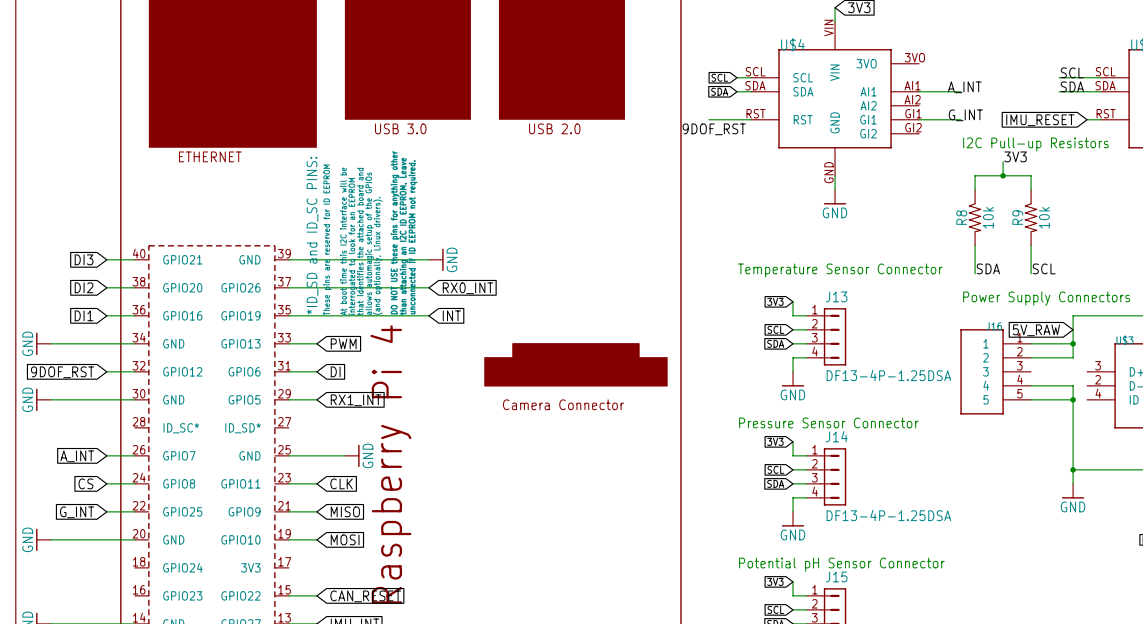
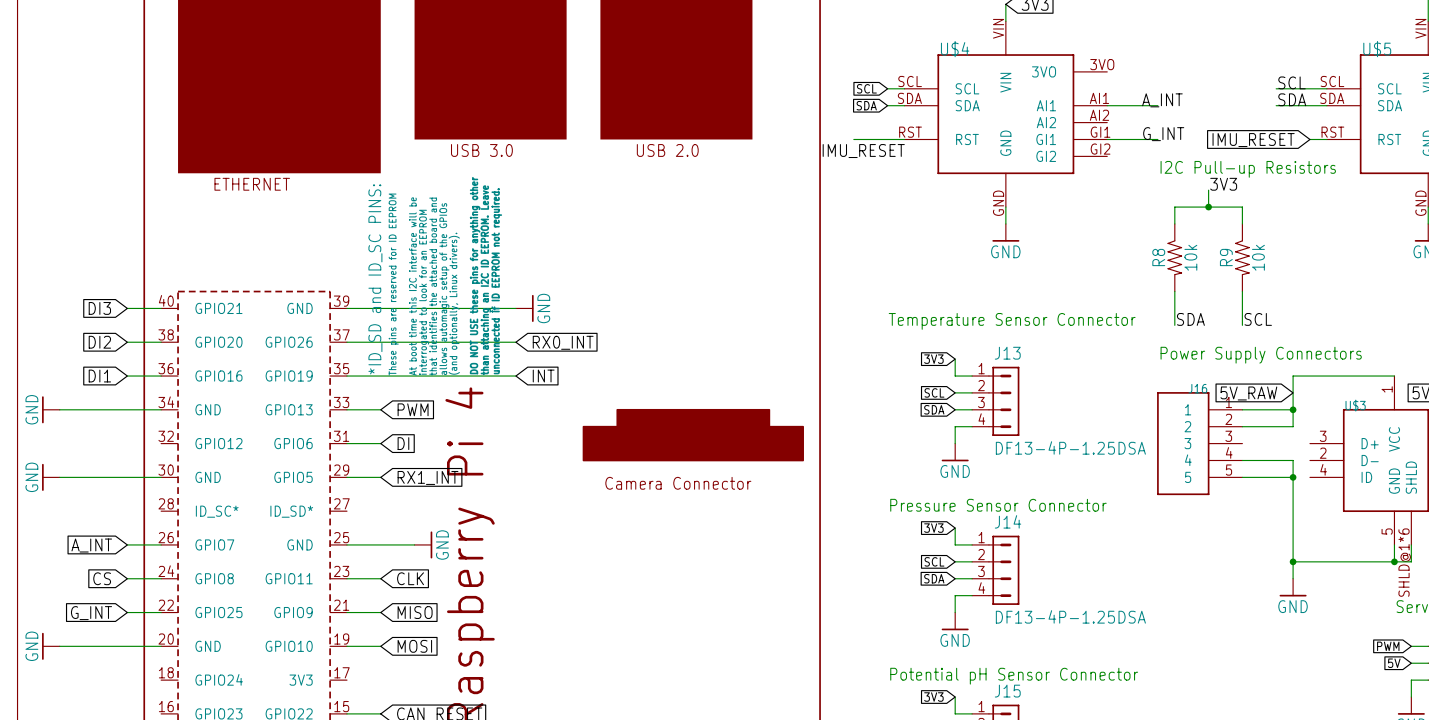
label: 9DOF_RST (714, 129) -> IMU_RESET (863, 151)
wire: (106, 371) (134, 371) -> none
global label: 9DOF_RST (62, 372) -> none

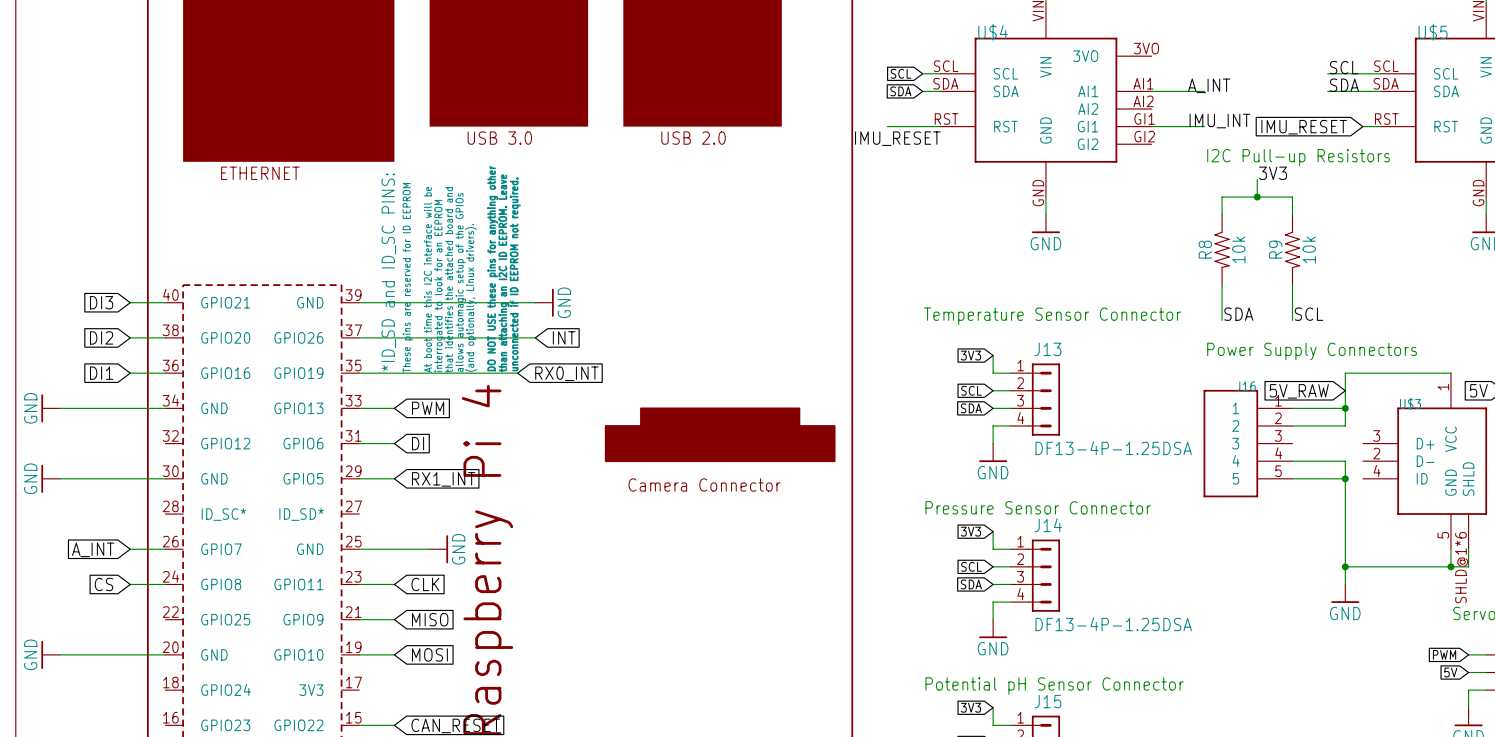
label: G_INT (1163, 134) -> IMU_INT (1219, 121)
global label: RX0_INT (563, 342) -> INT (564, 337)
wire: (499, 376) (515, 376) -> none
global label: INT (543, 376) -> none
global label: none -> RX0_INT (566, 373)
wire: (127, 612) (161, 612) -> none
global label: G_INT (91, 613) -> none

